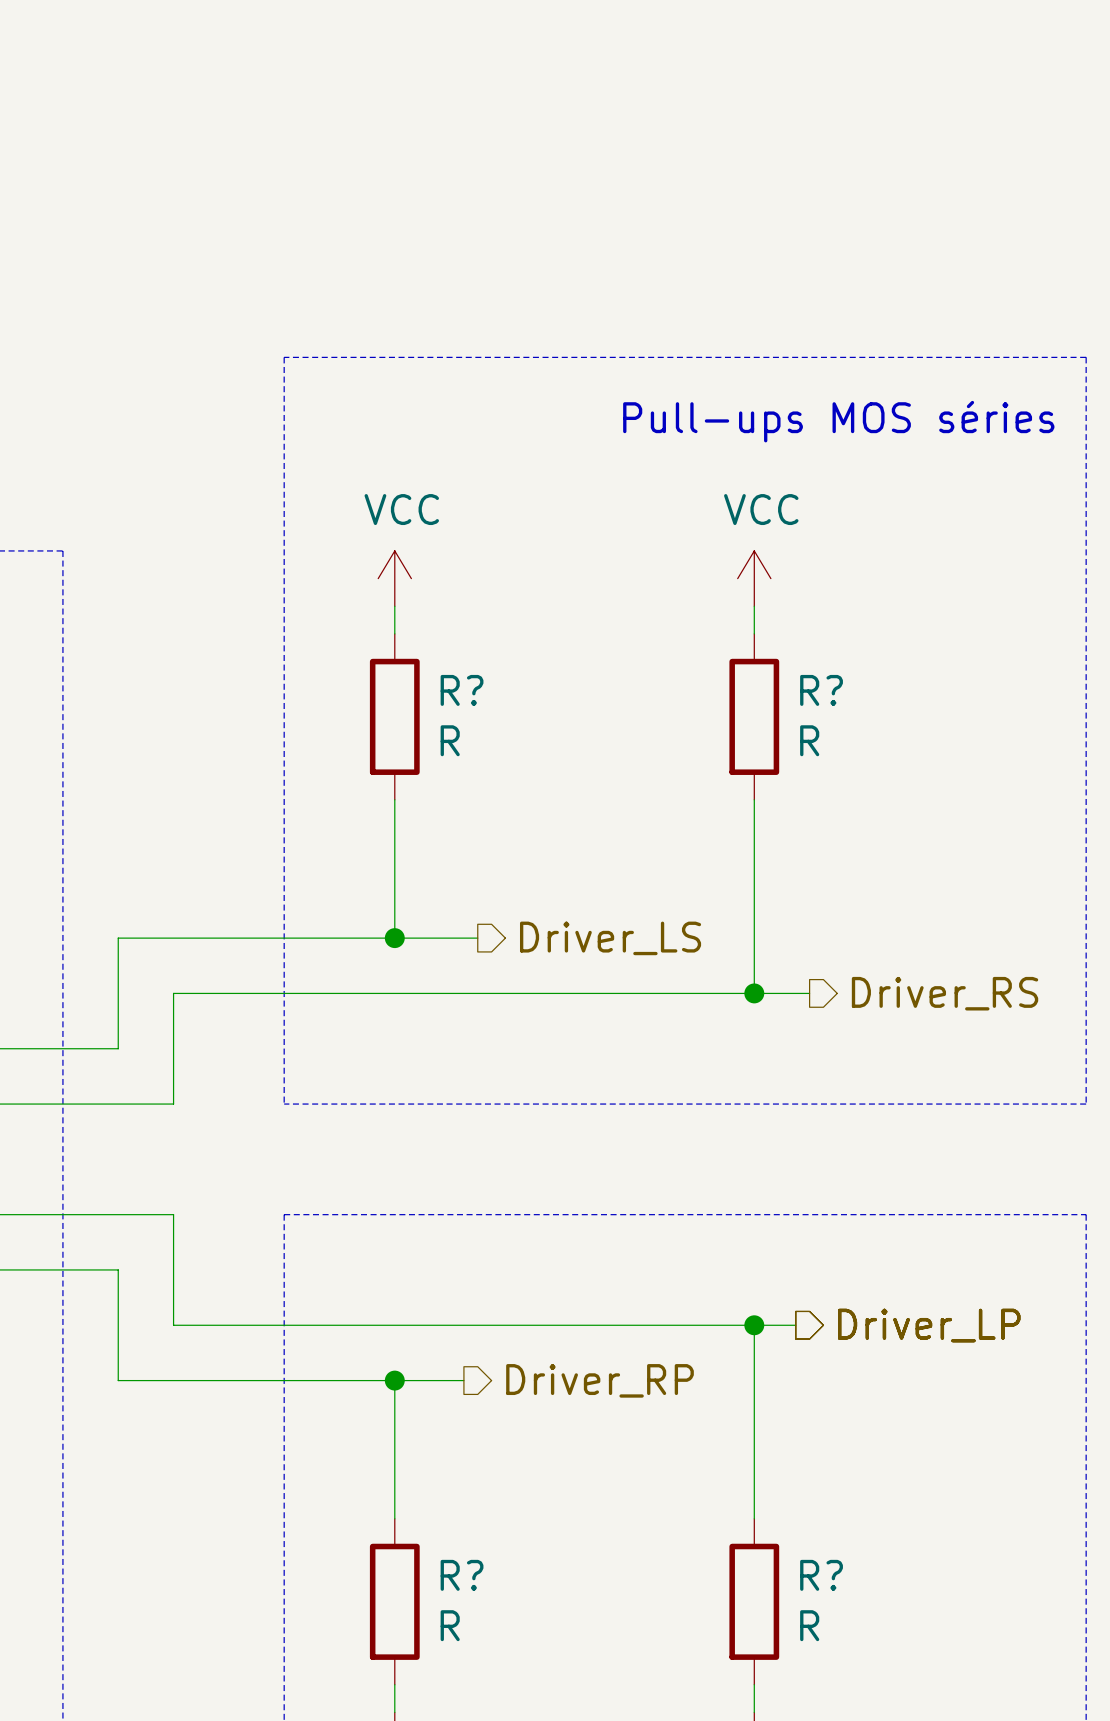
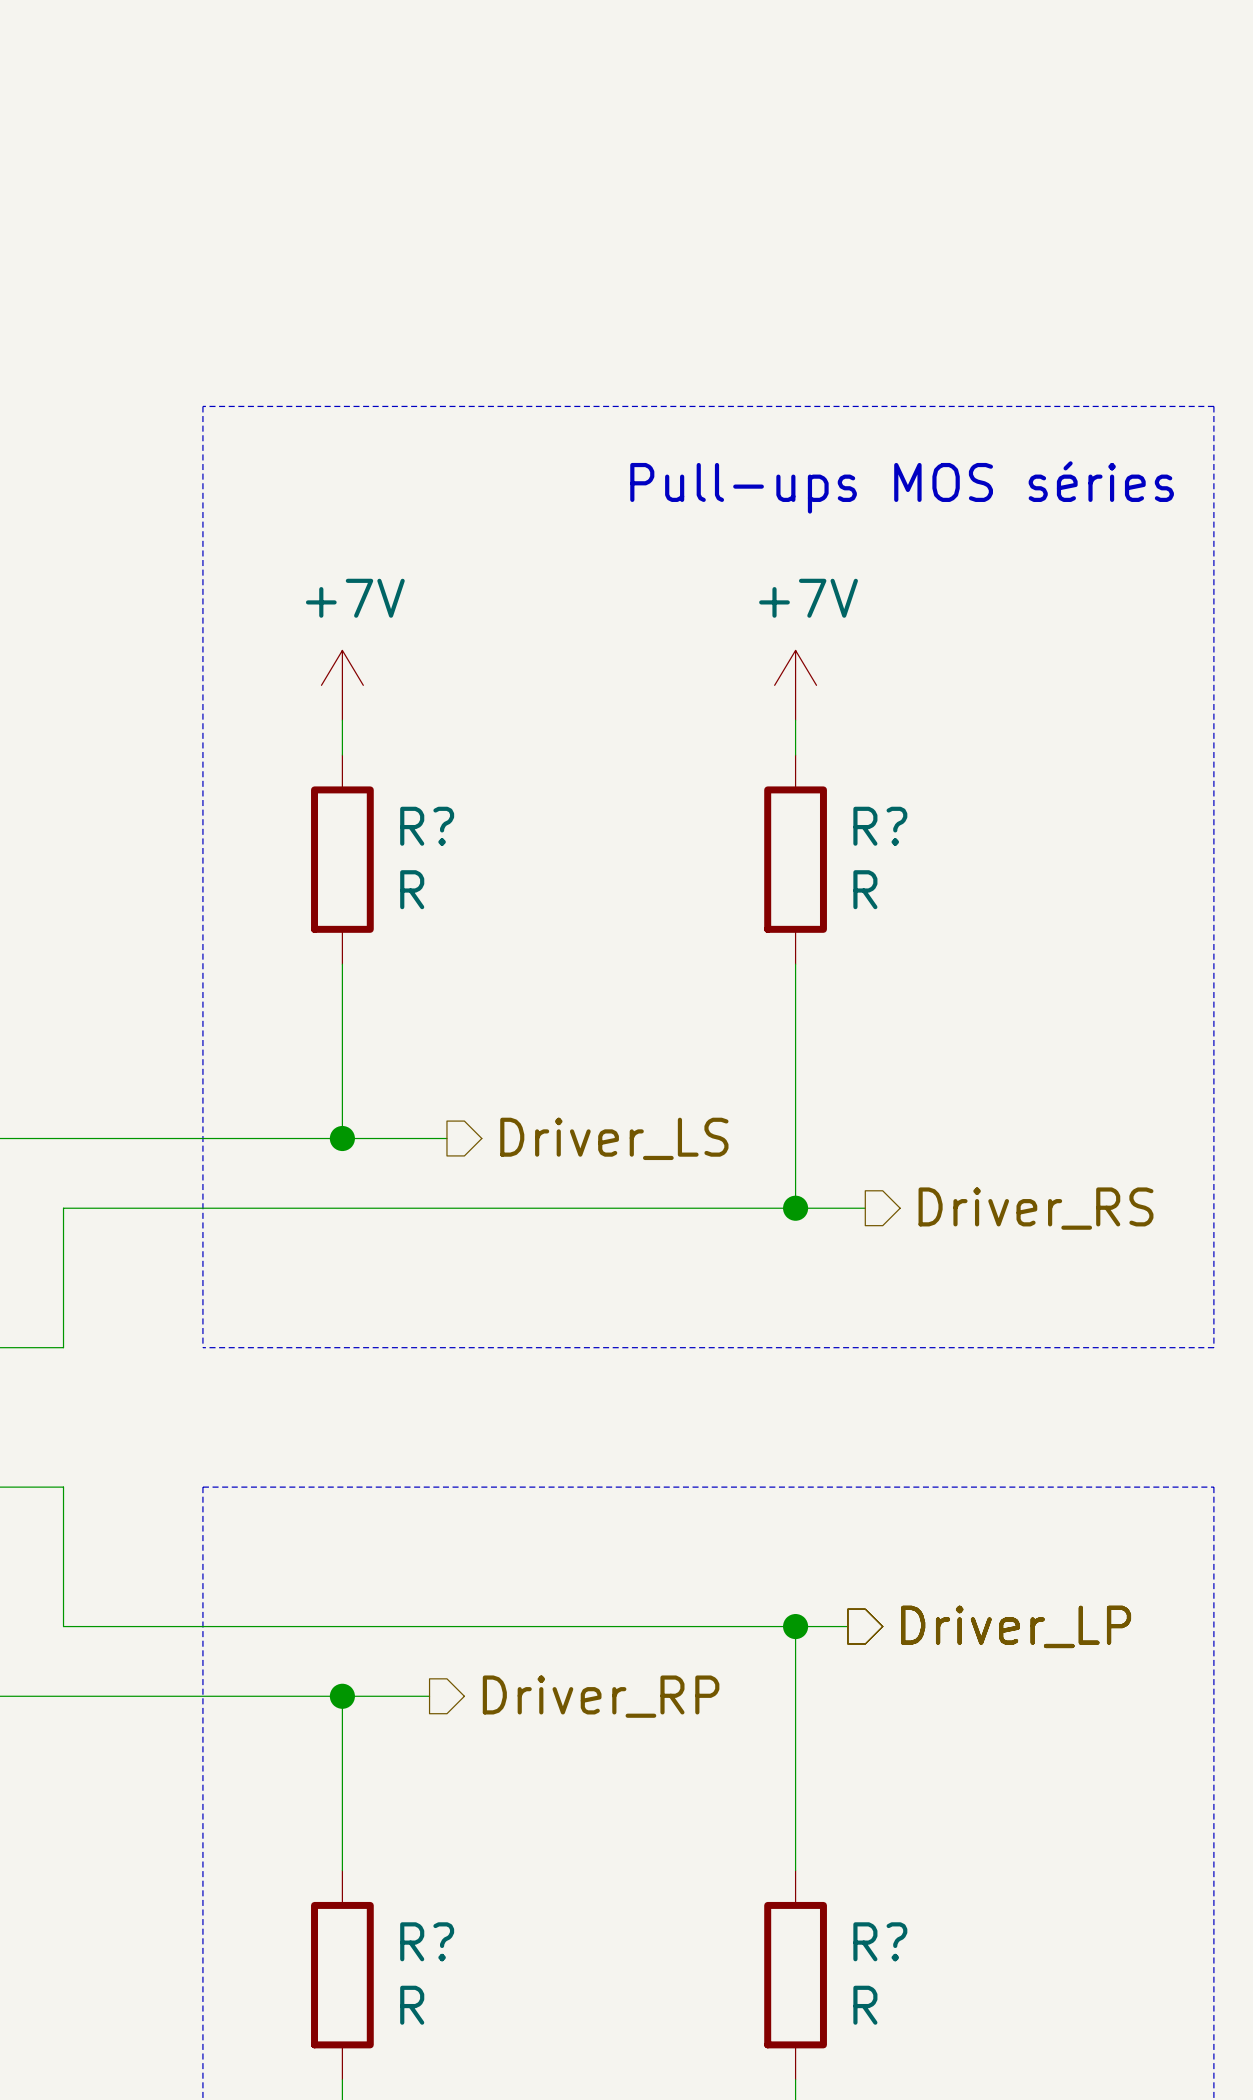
power symbol: VCC (394, 578) -> +7V (342, 685)
power symbol: VCC (754, 578) -> +7V (795, 685)

